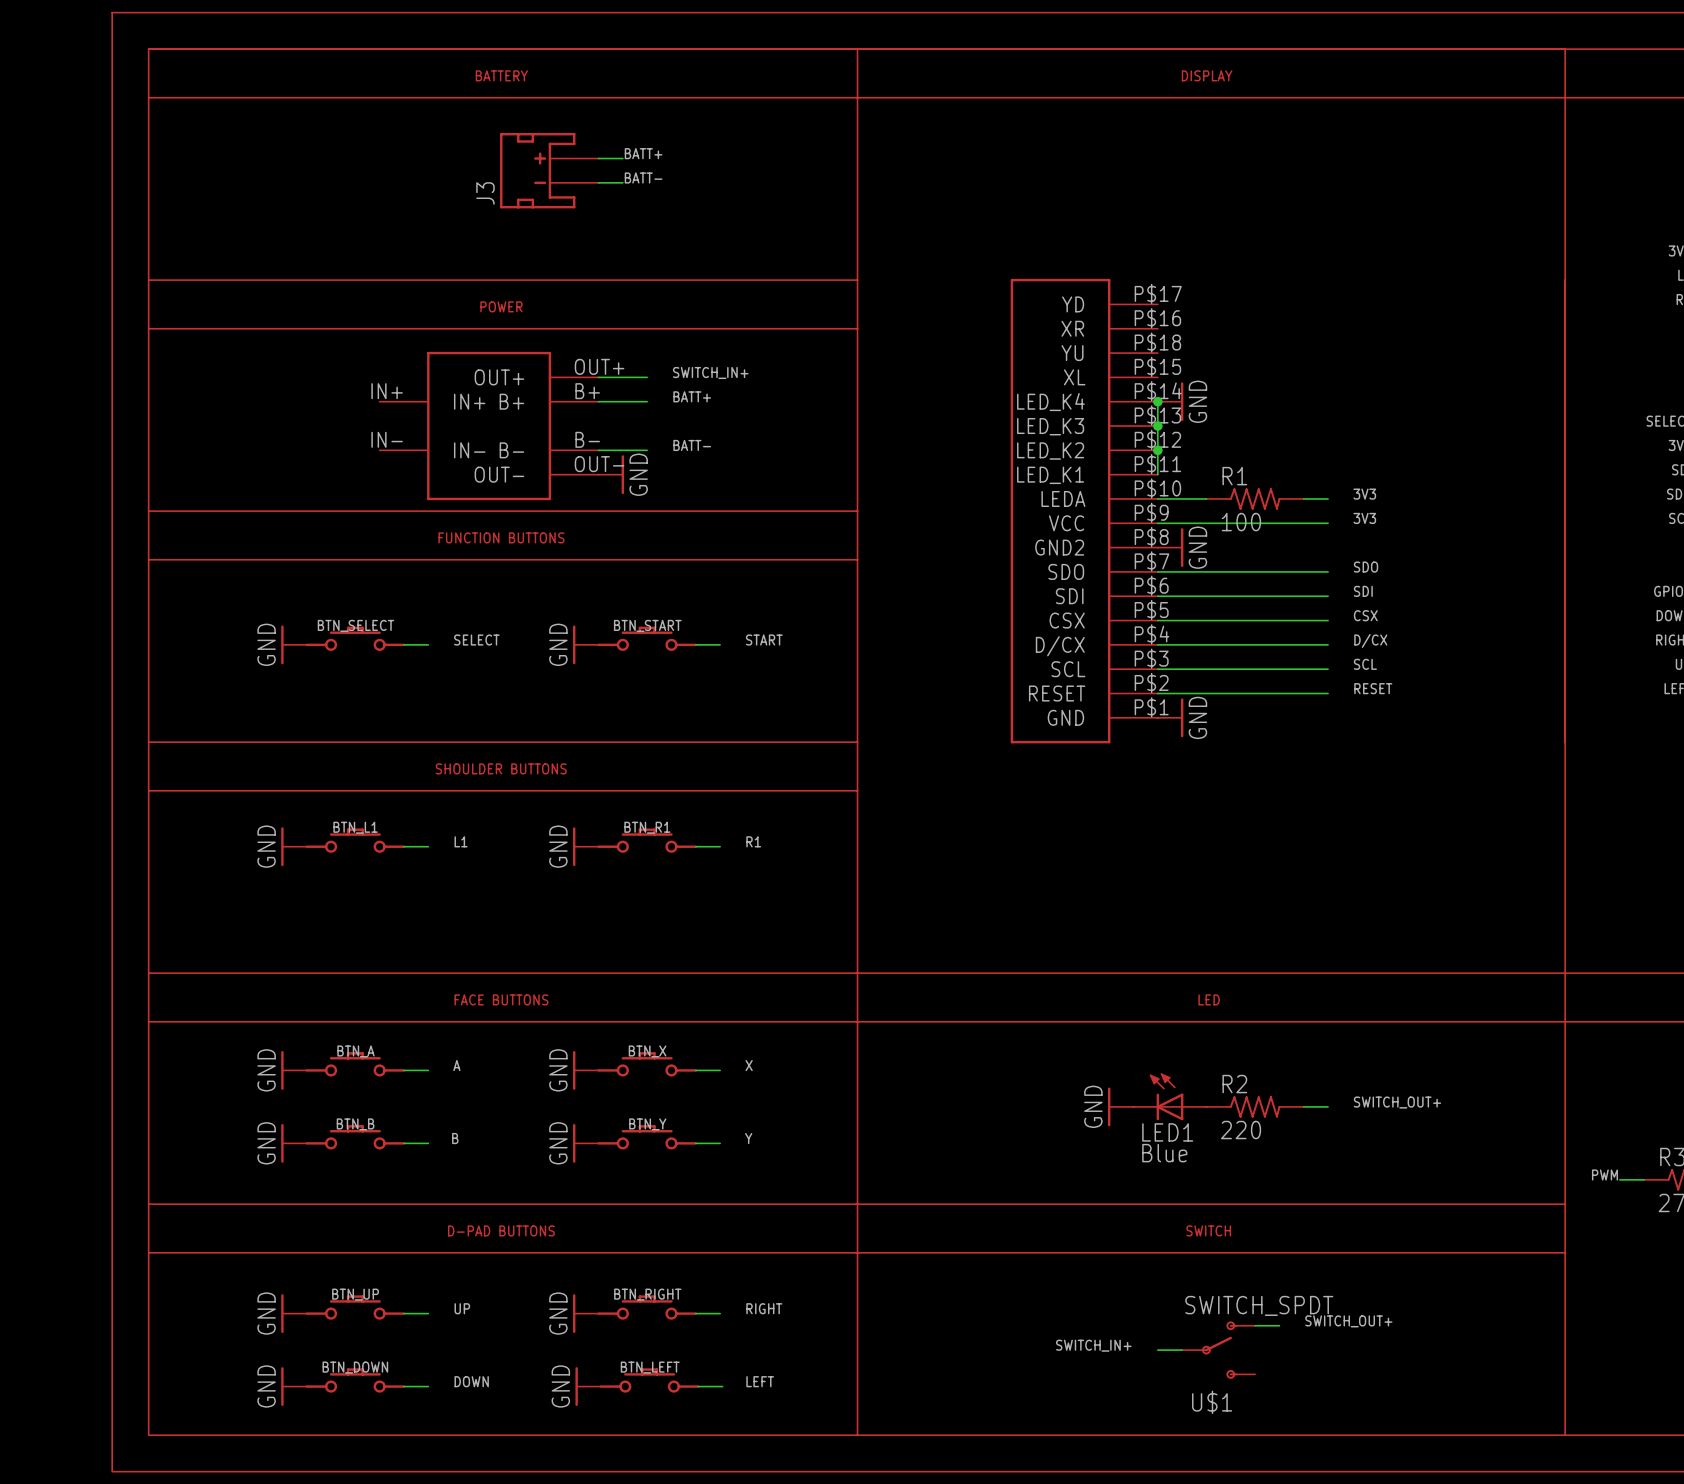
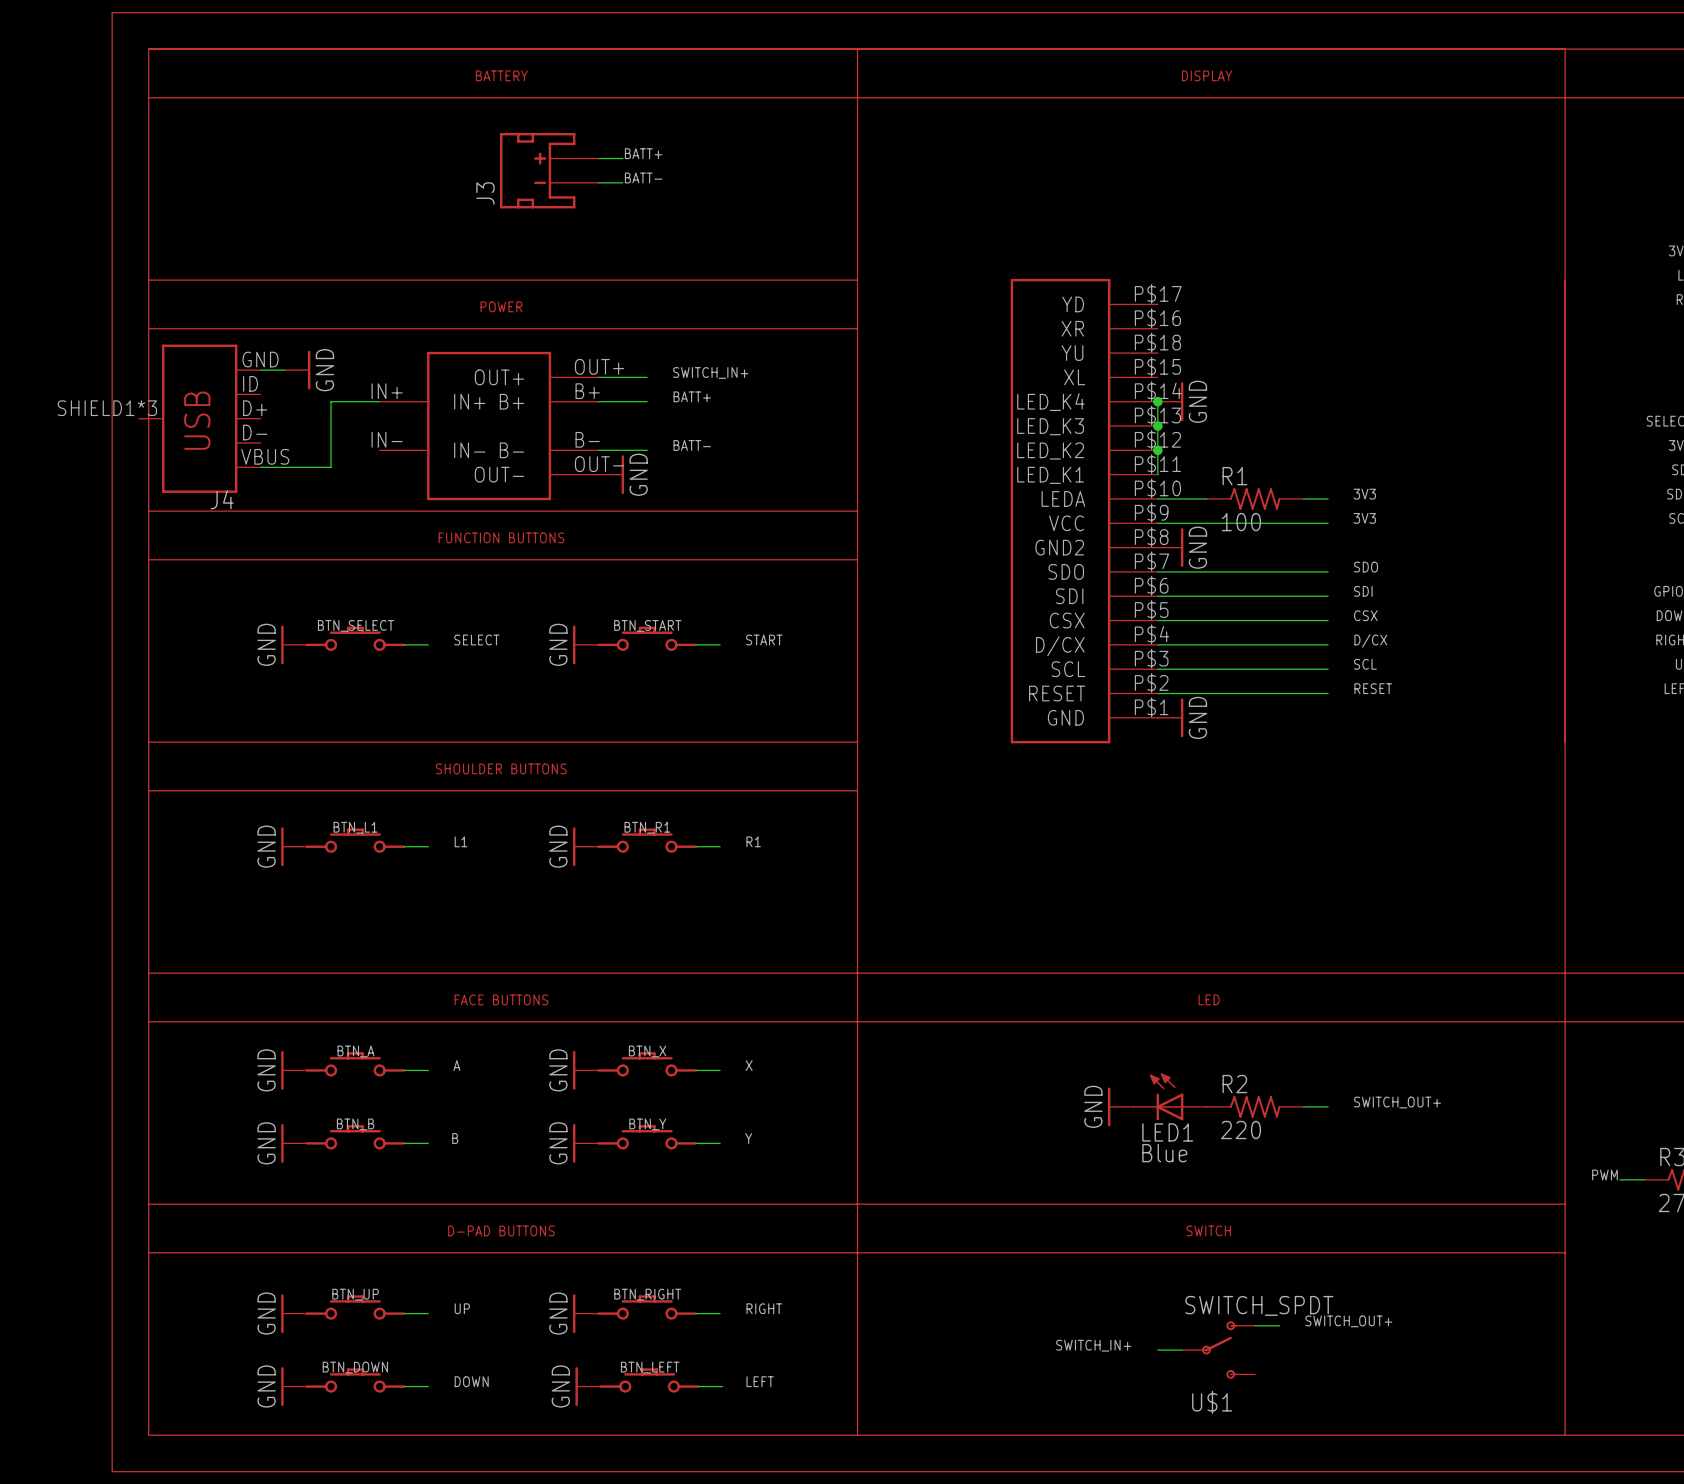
wire: none -> (260, 370) (284, 370)
power symbol: none -> GND (297, 370)
wire: none -> (379, 401) (331, 401) (331, 467) (260, 467)
J4: none -> (199, 418)

